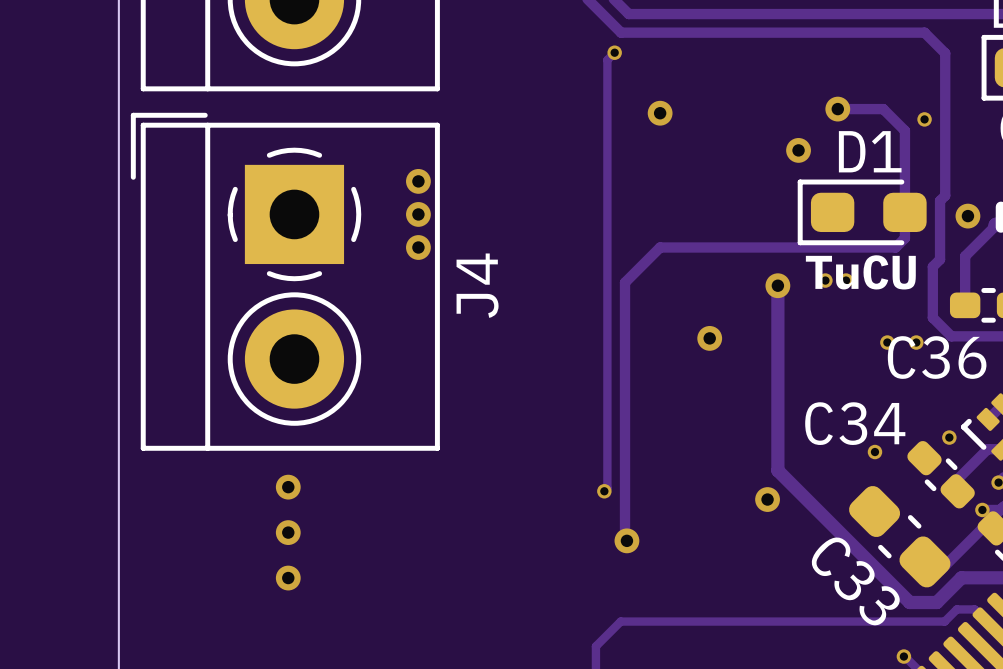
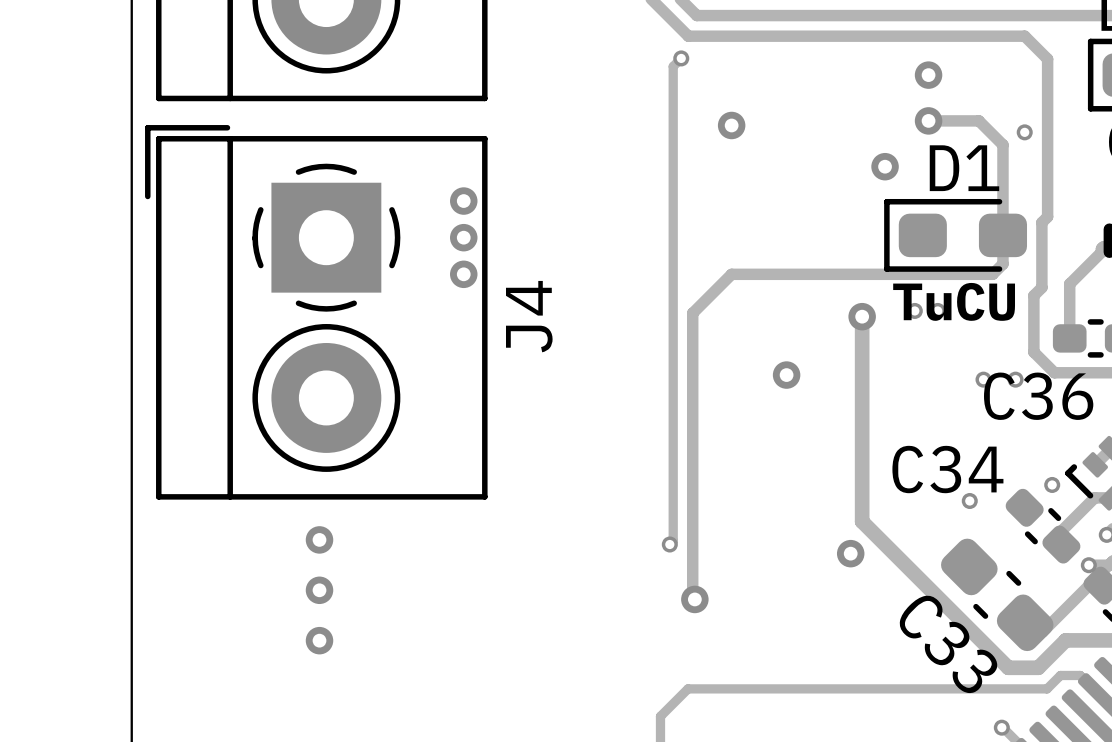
via: none -> (928, 75)
via: (967, 216) -> none

